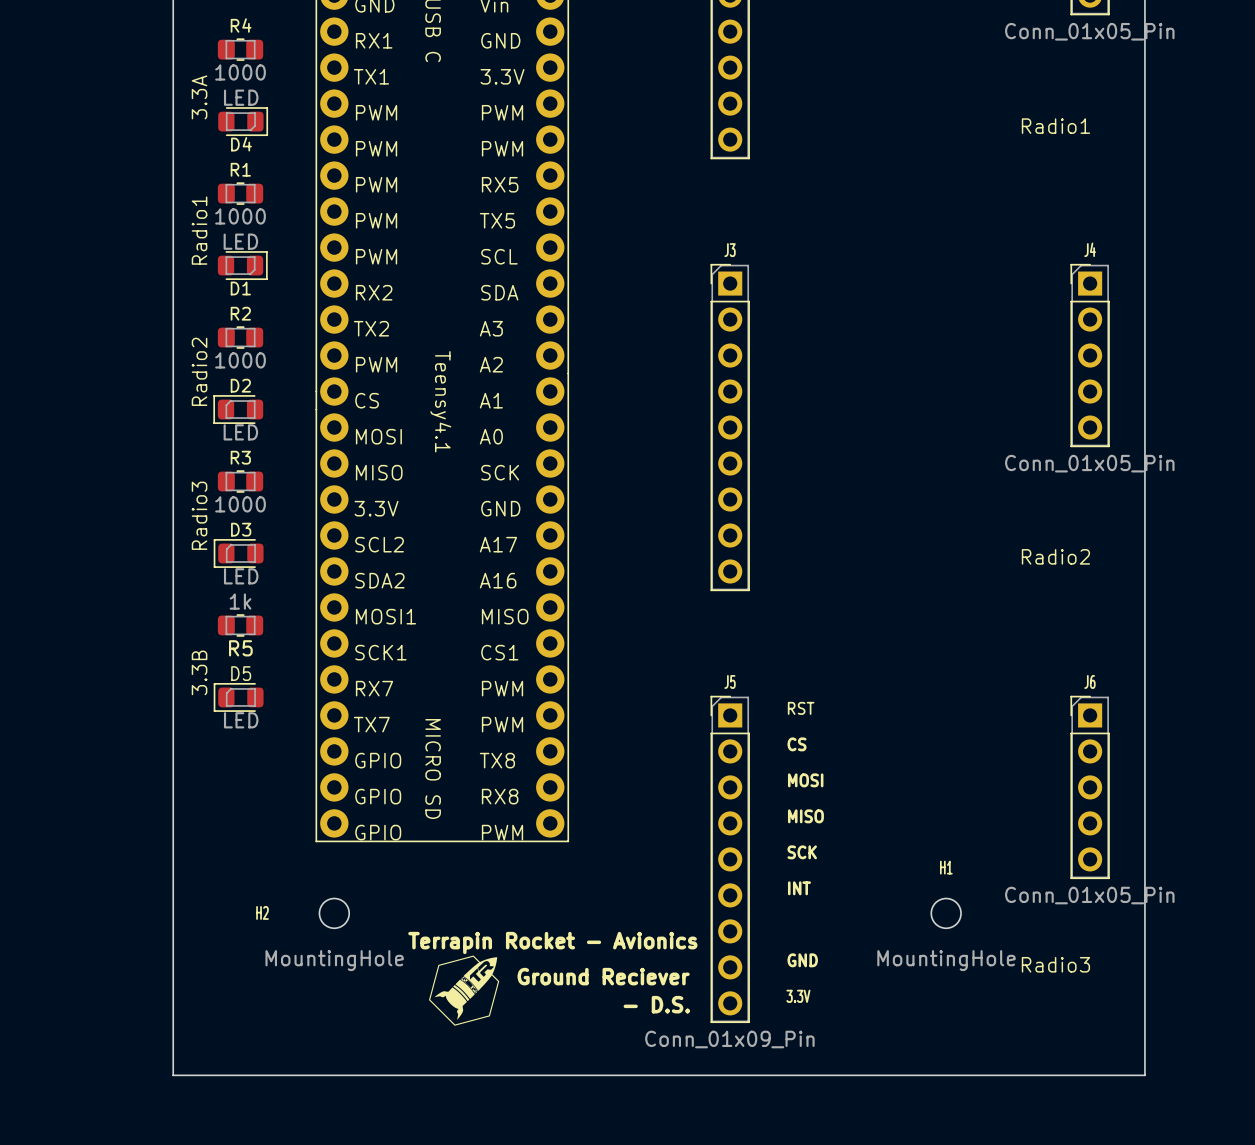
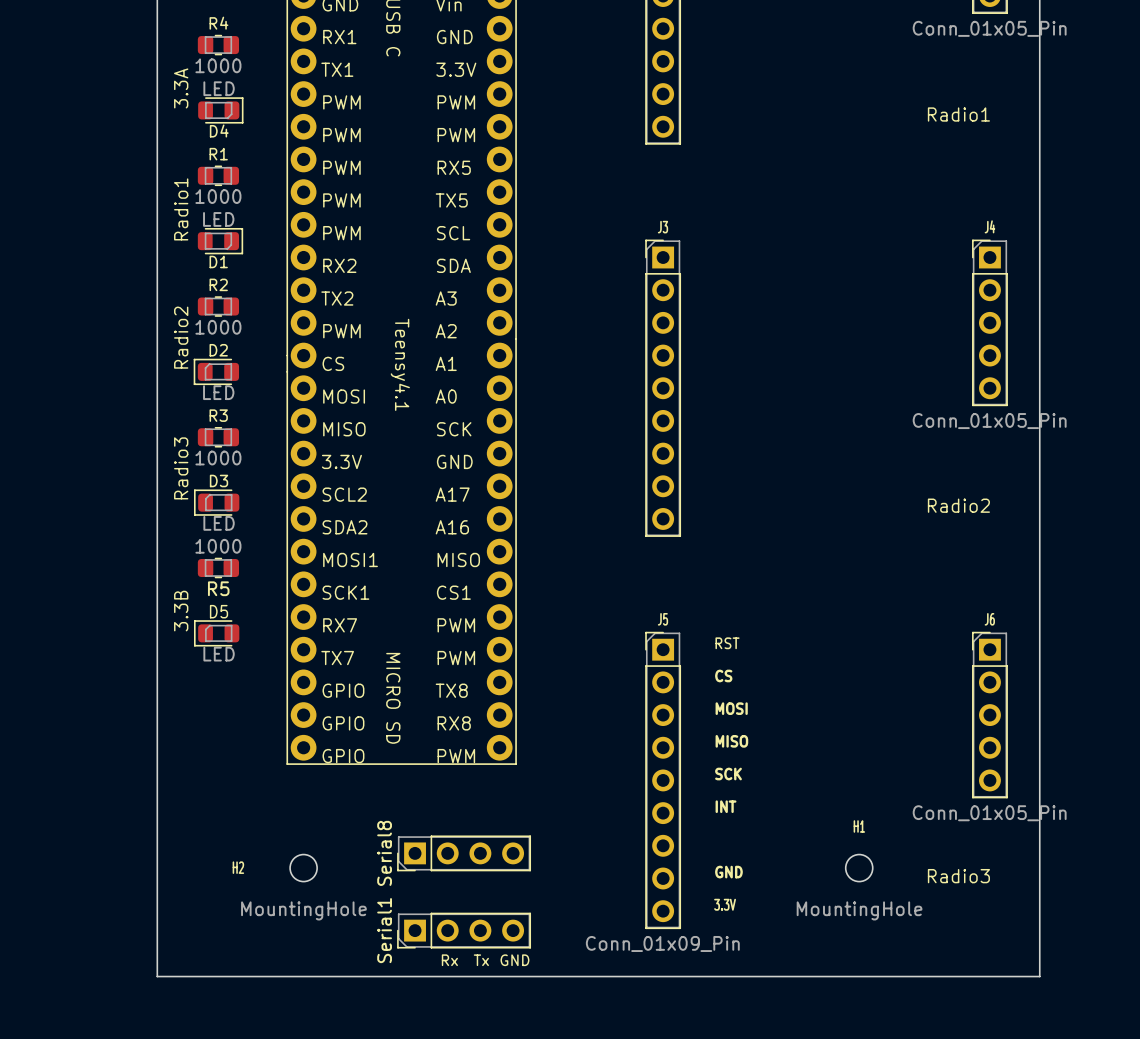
R5 value: 1k (240, 601) -> 1000 (218, 546)
H2 position: (334, 913) -> (303, 868)
H1 position: (946, 913) -> (859, 868)
Serial8: none -> (464, 853)
text: Terrapin Rocket - Avionics (552, 942) -> none
drawing: [428, 955, 500, 1026] -> none
text: Ground Reciever (603, 976) -> none
text: - D.S. (656, 1004) -> none
Serial1: none -> (464, 930)
text: none -> Rx (449, 960)
text: none -> Tx (481, 960)
text: none -> GND (514, 960)

